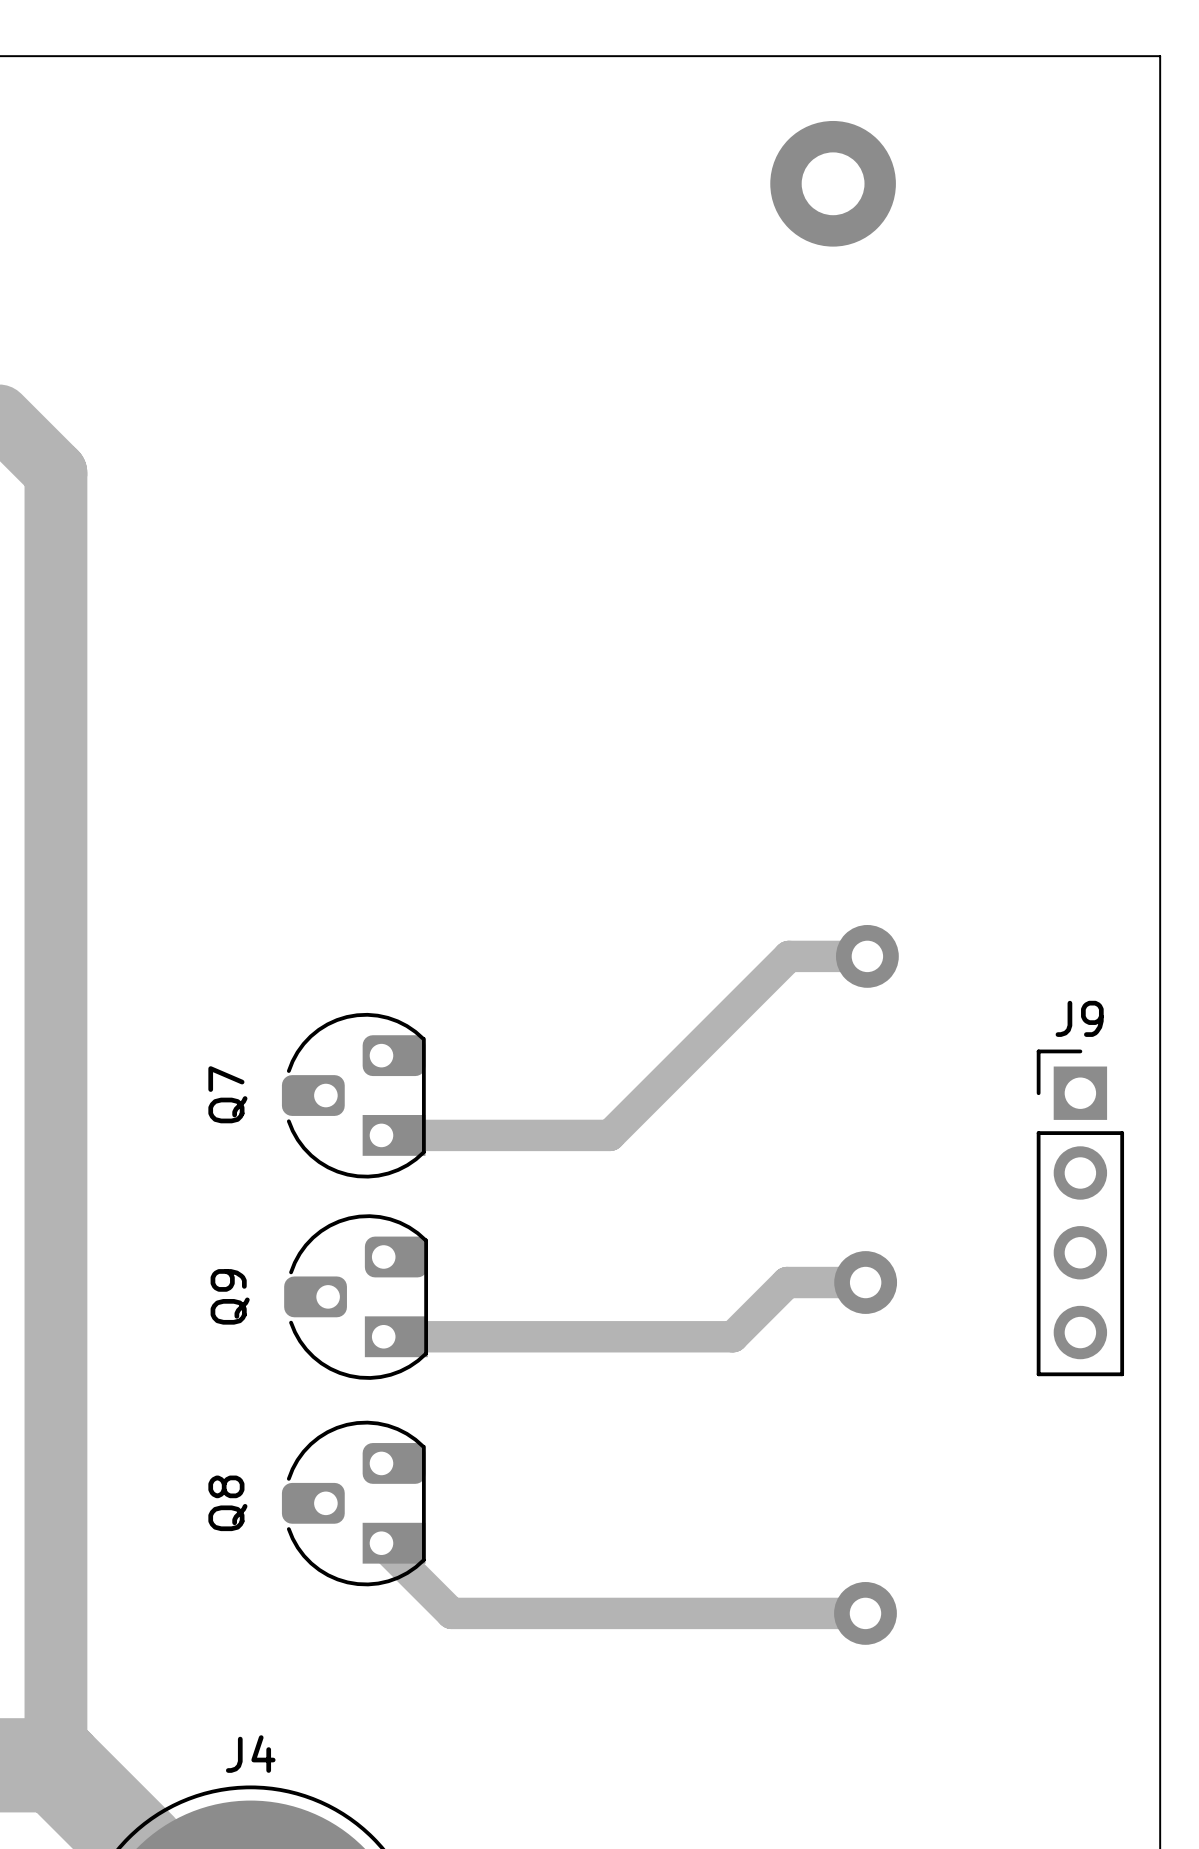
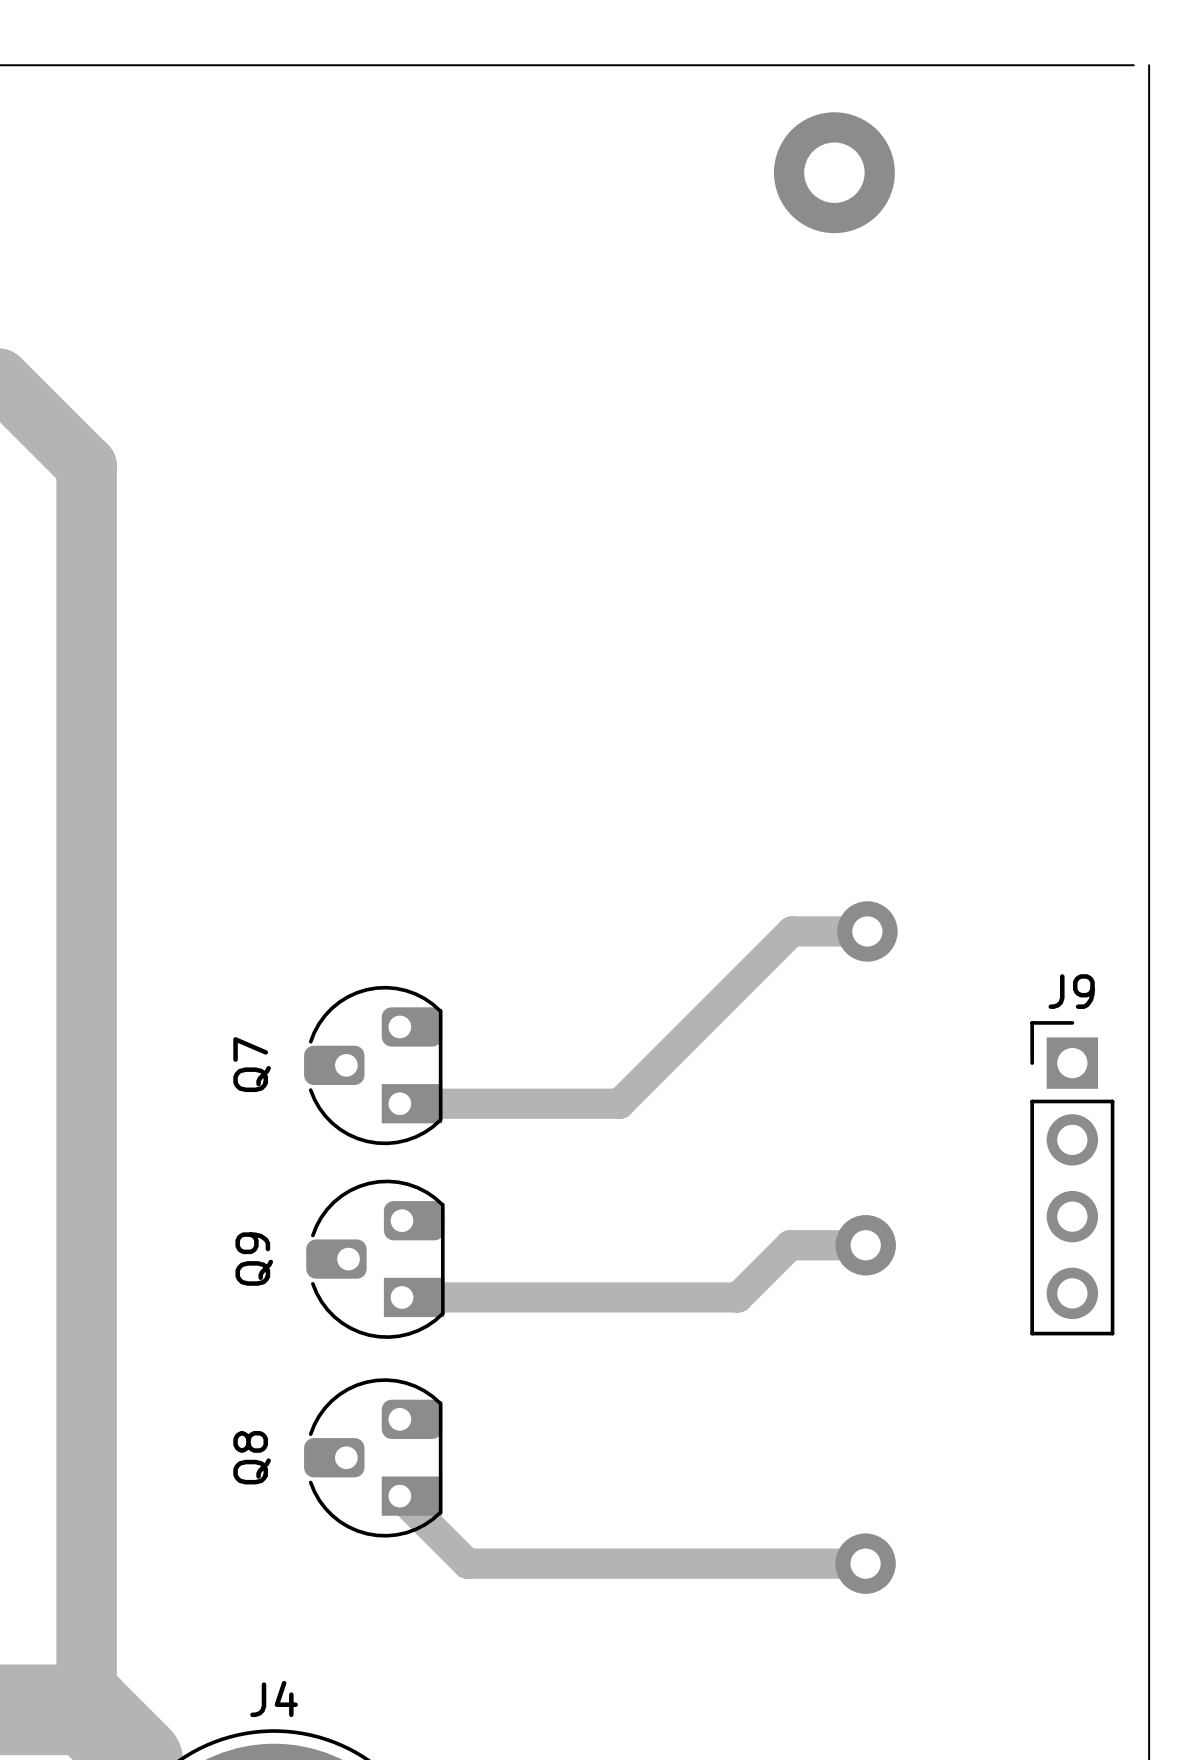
board edge: (1144, 56) (1160, 56) -> none
via position: (833, 183) -> (834, 172)

